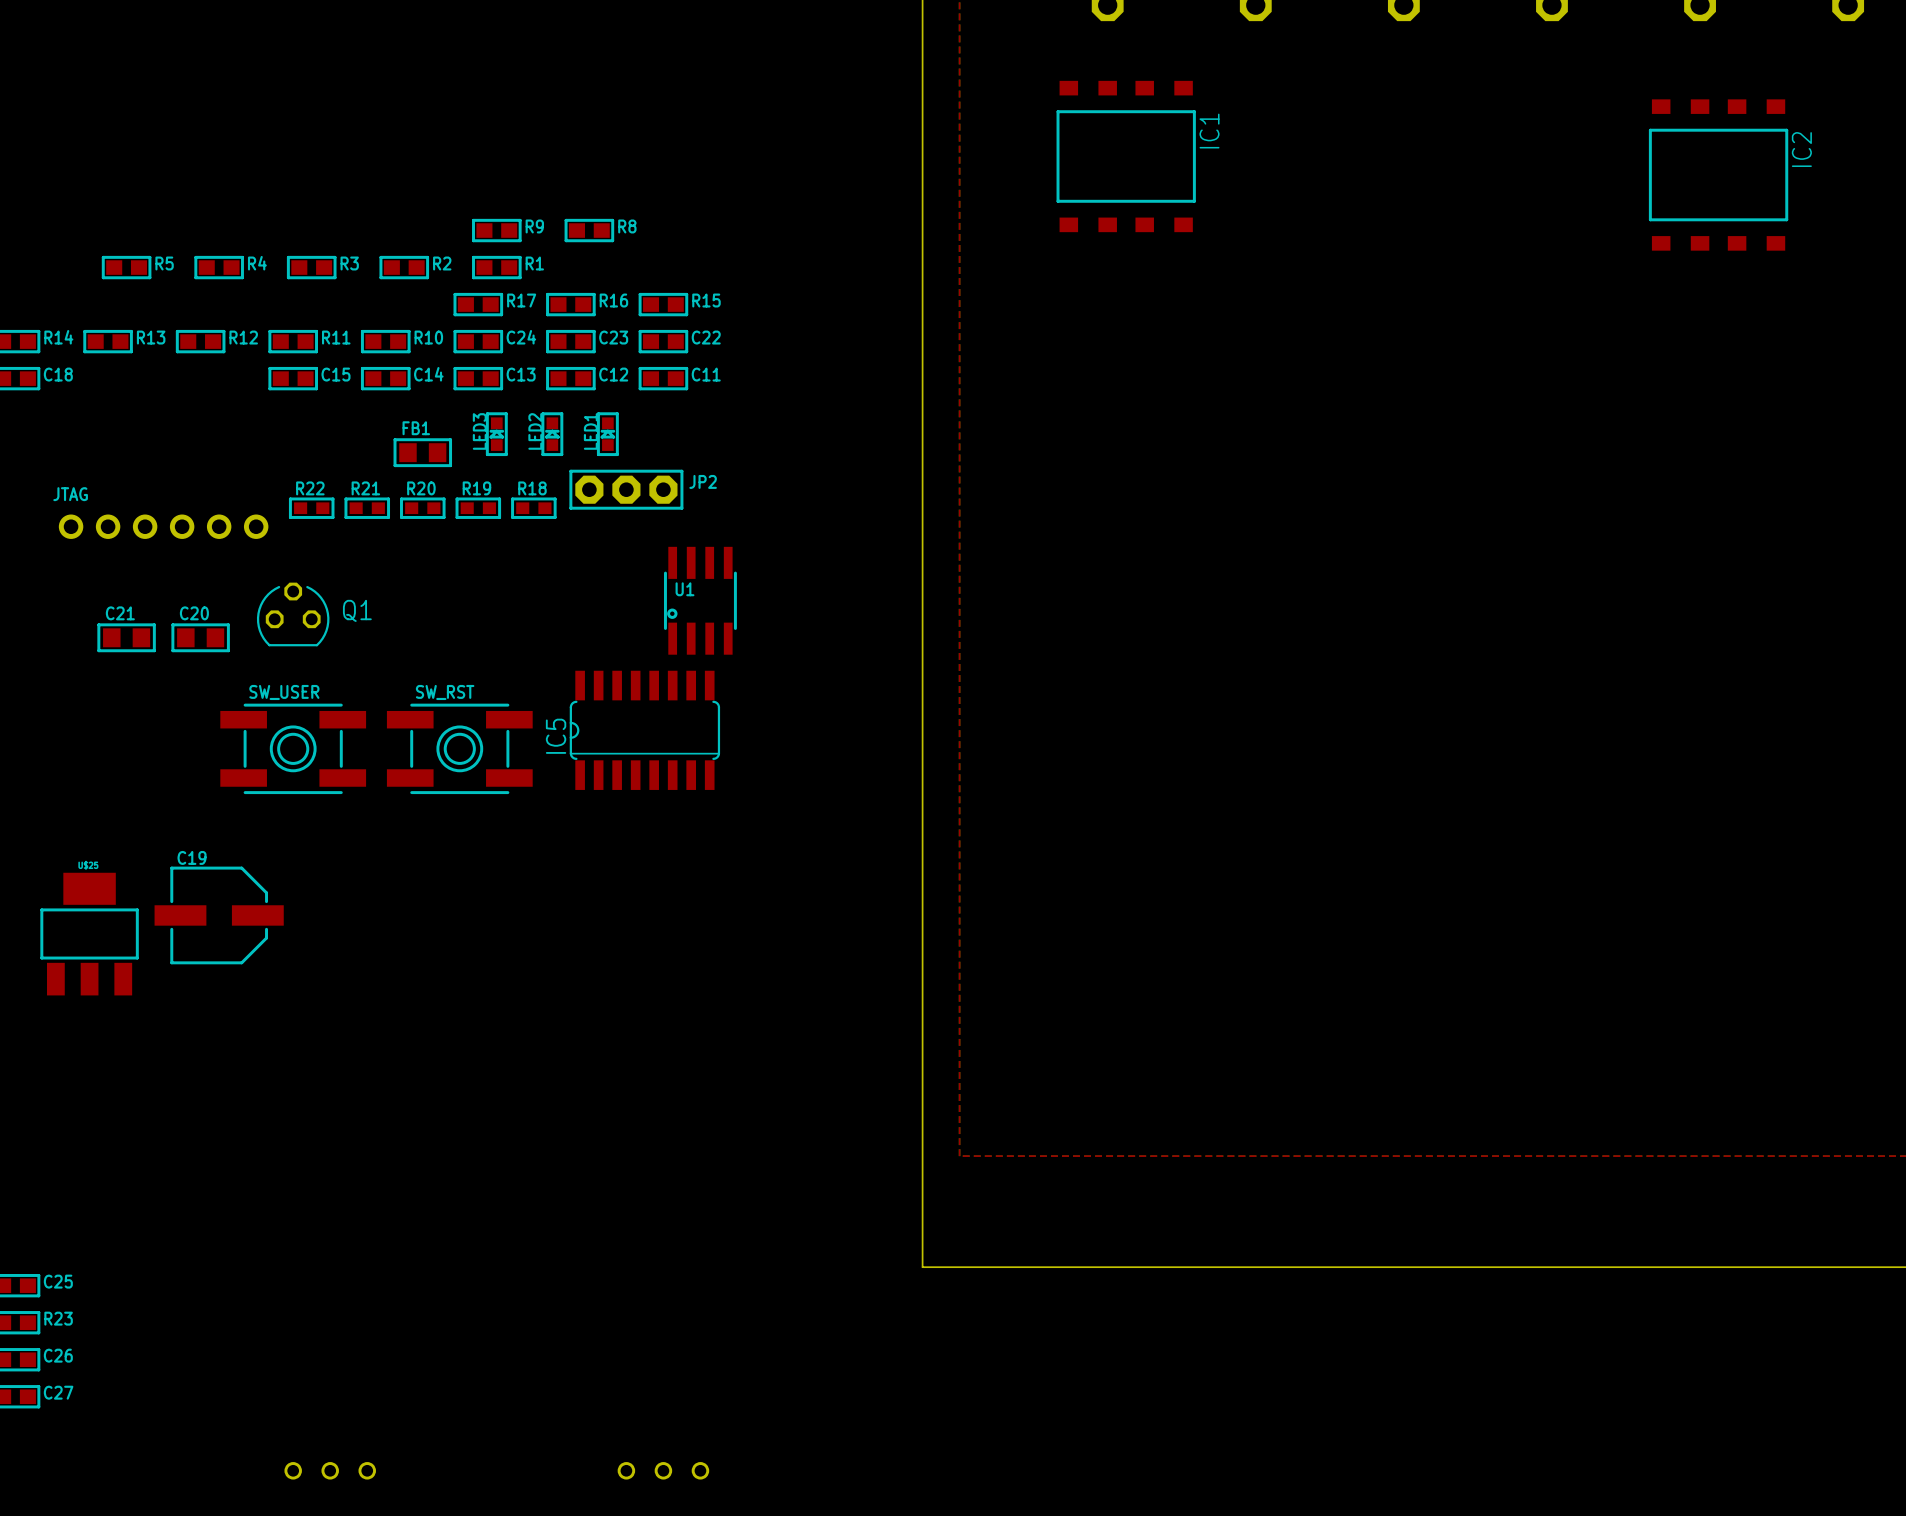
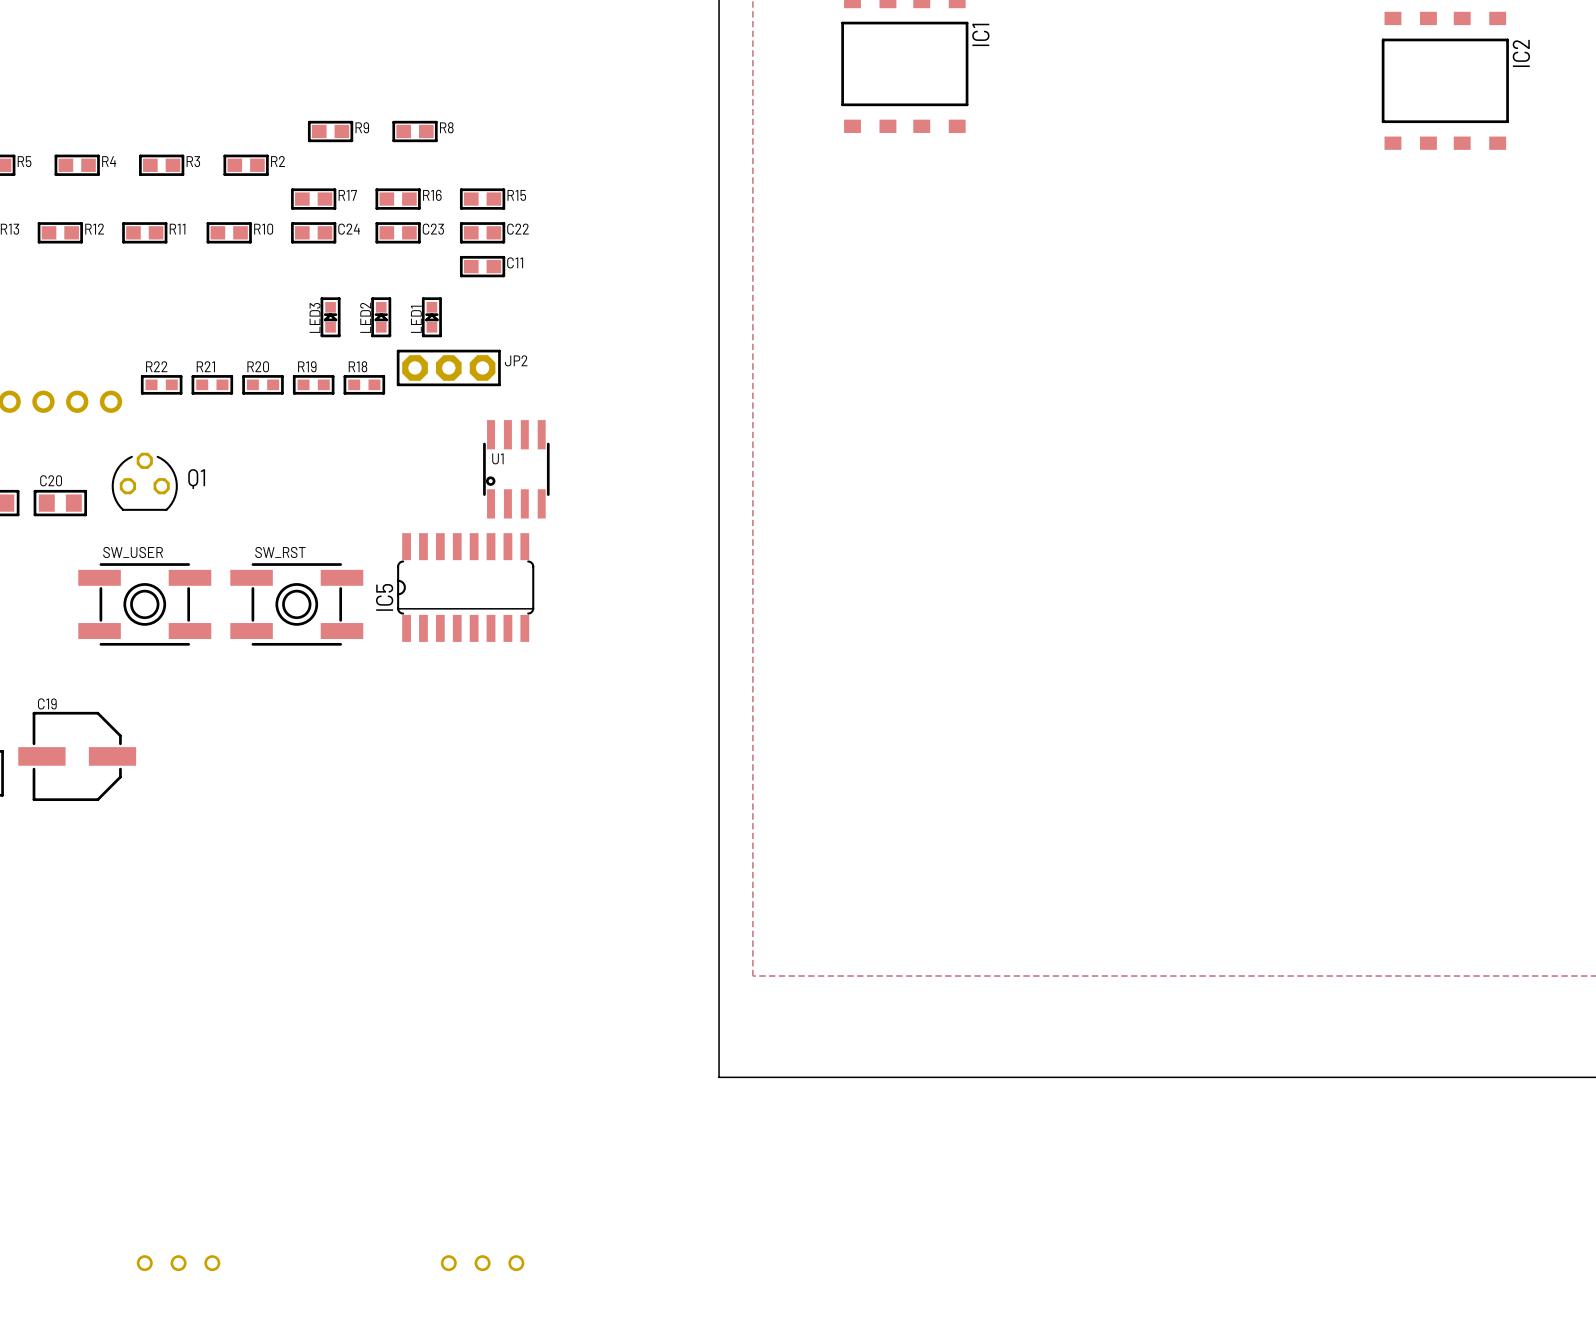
R1: (496, 267) -> none
C15: (293, 378) -> none
C14: (385, 378) -> none
C13: (478, 378) -> none
C12: (570, 378) -> none
FB1: (422, 452) -> none

